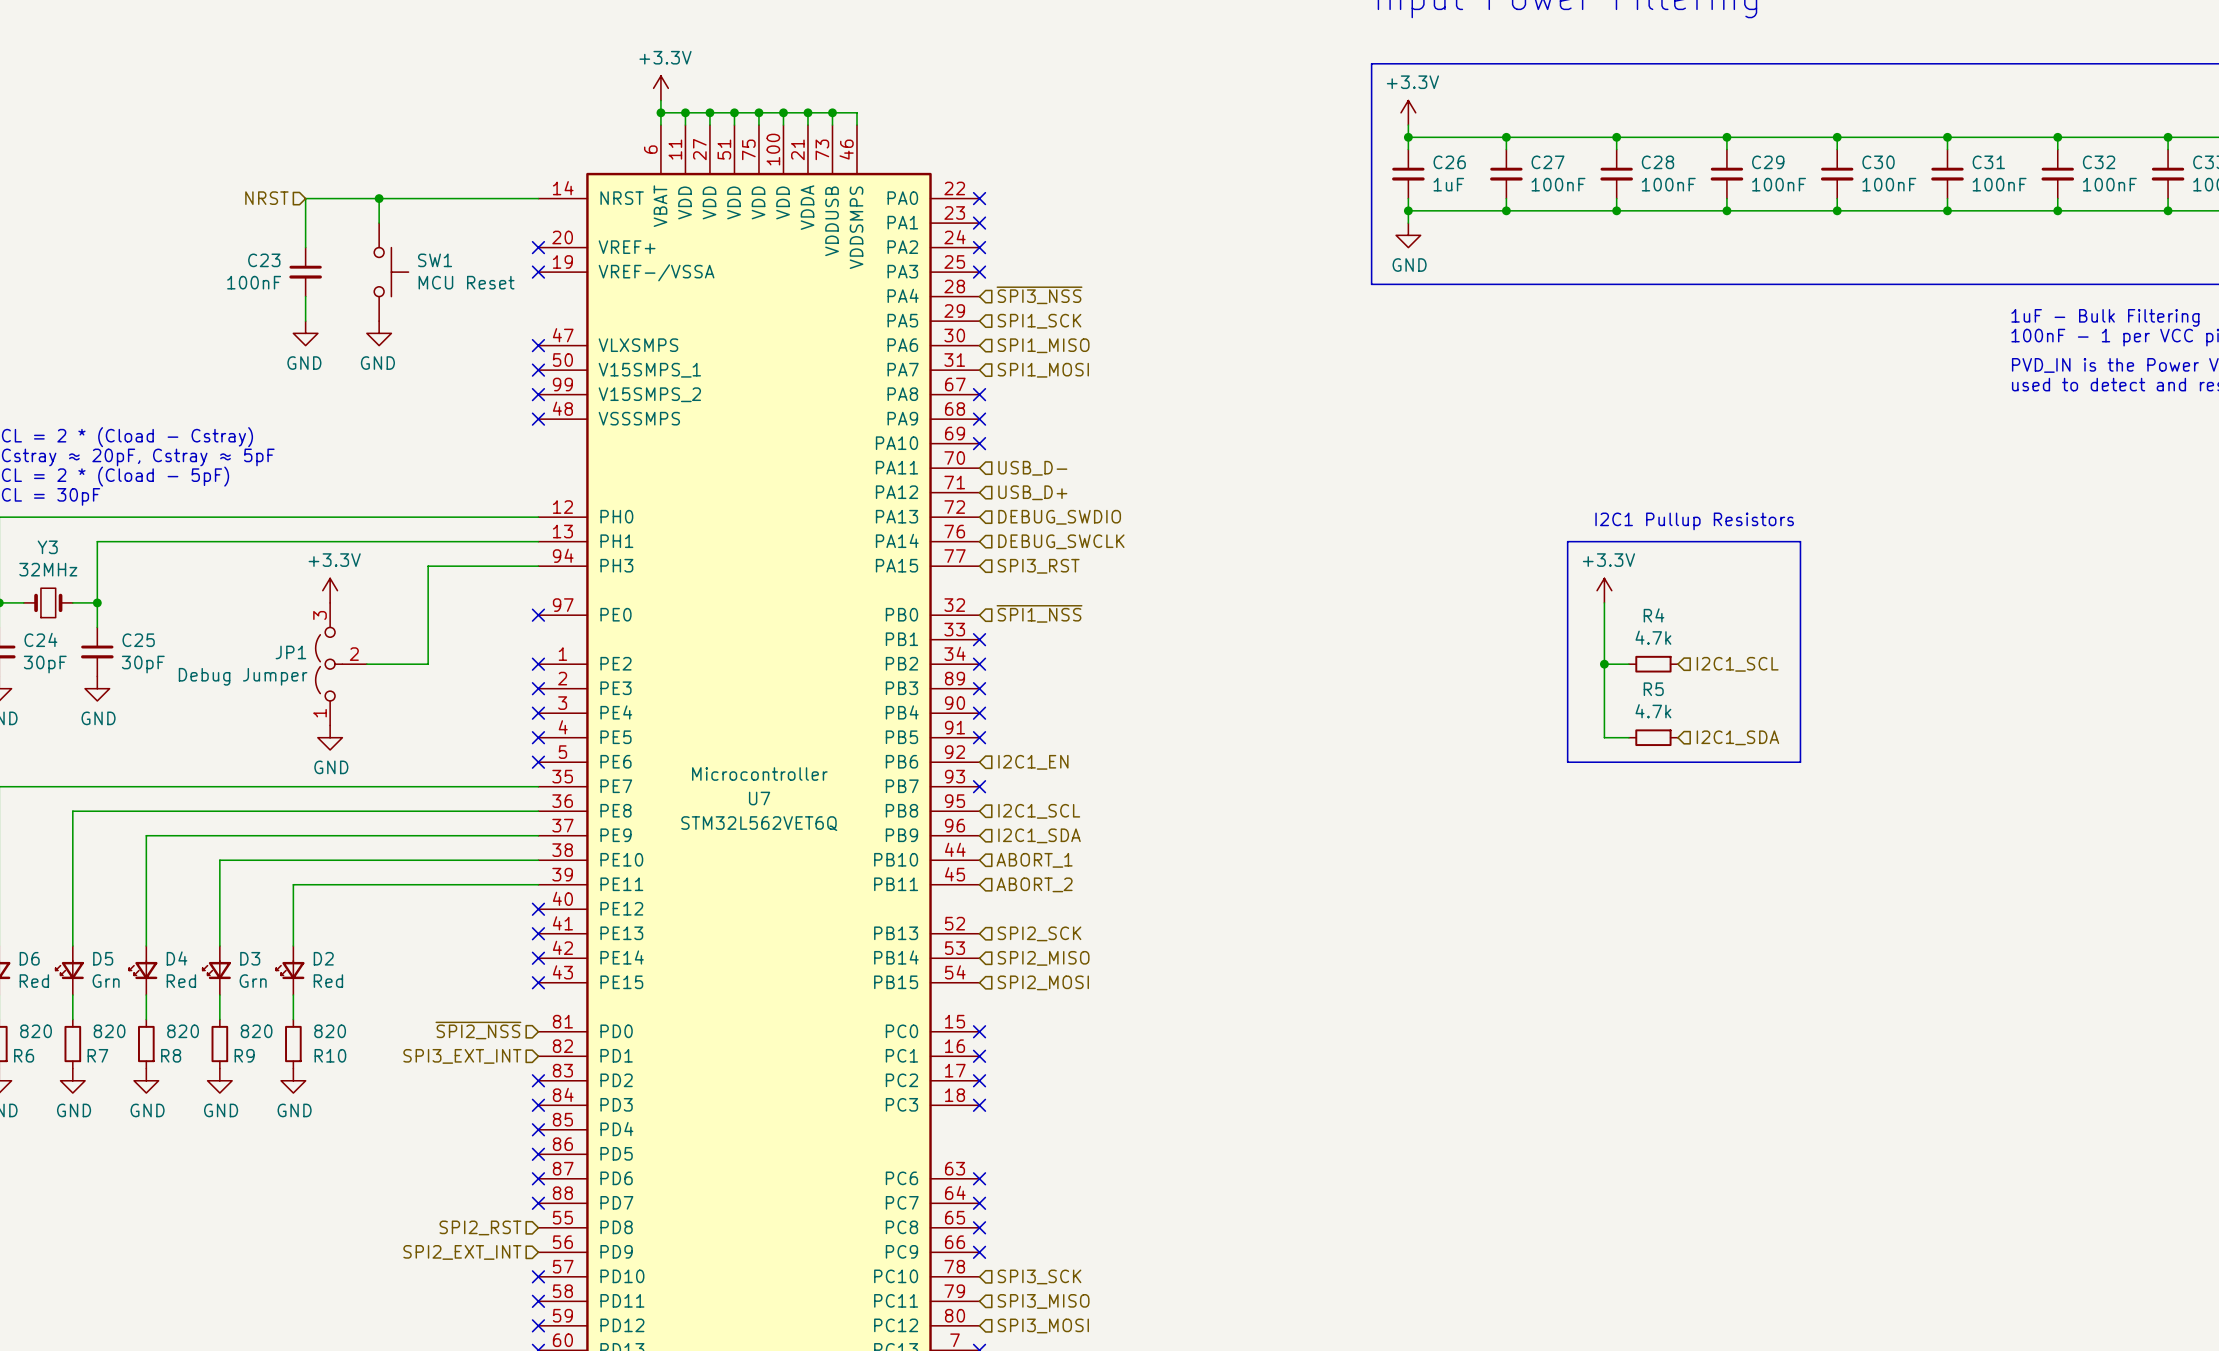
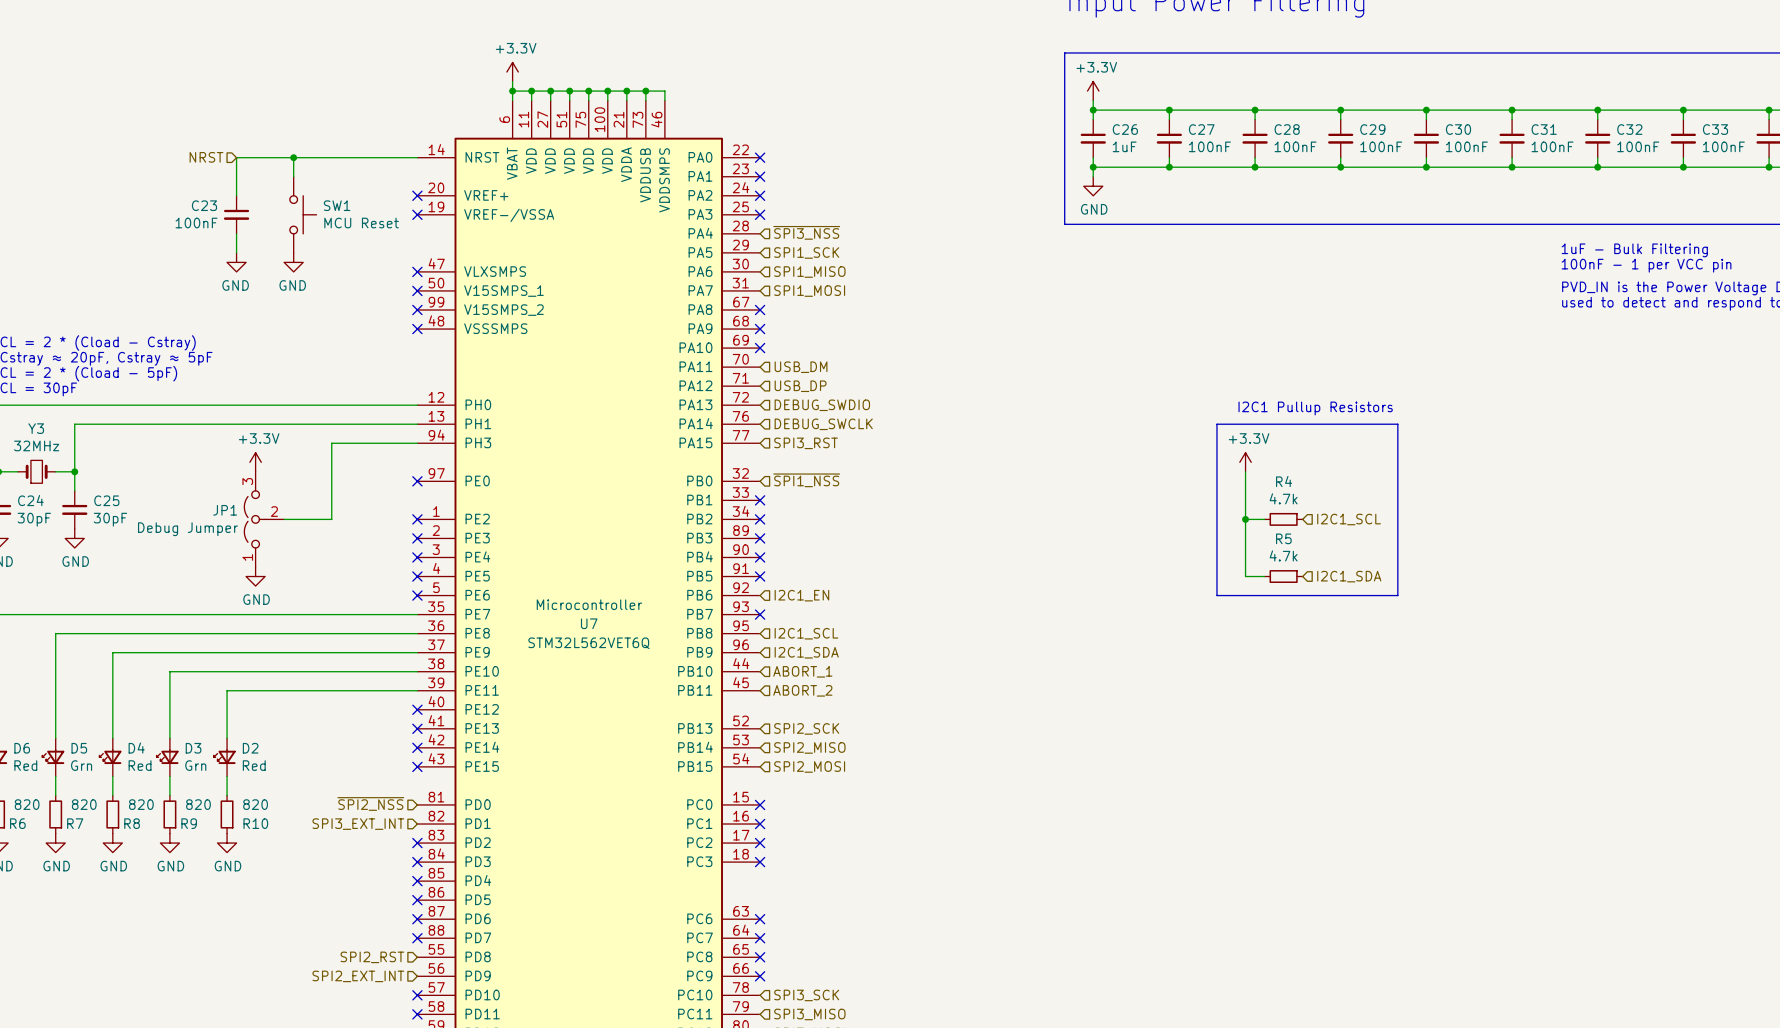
hierarchical label: USB_D- (1032, 468) -> USB_DM (801, 367)
hierarchical label: USB_D+ (1032, 492) -> USB_DP (800, 386)

